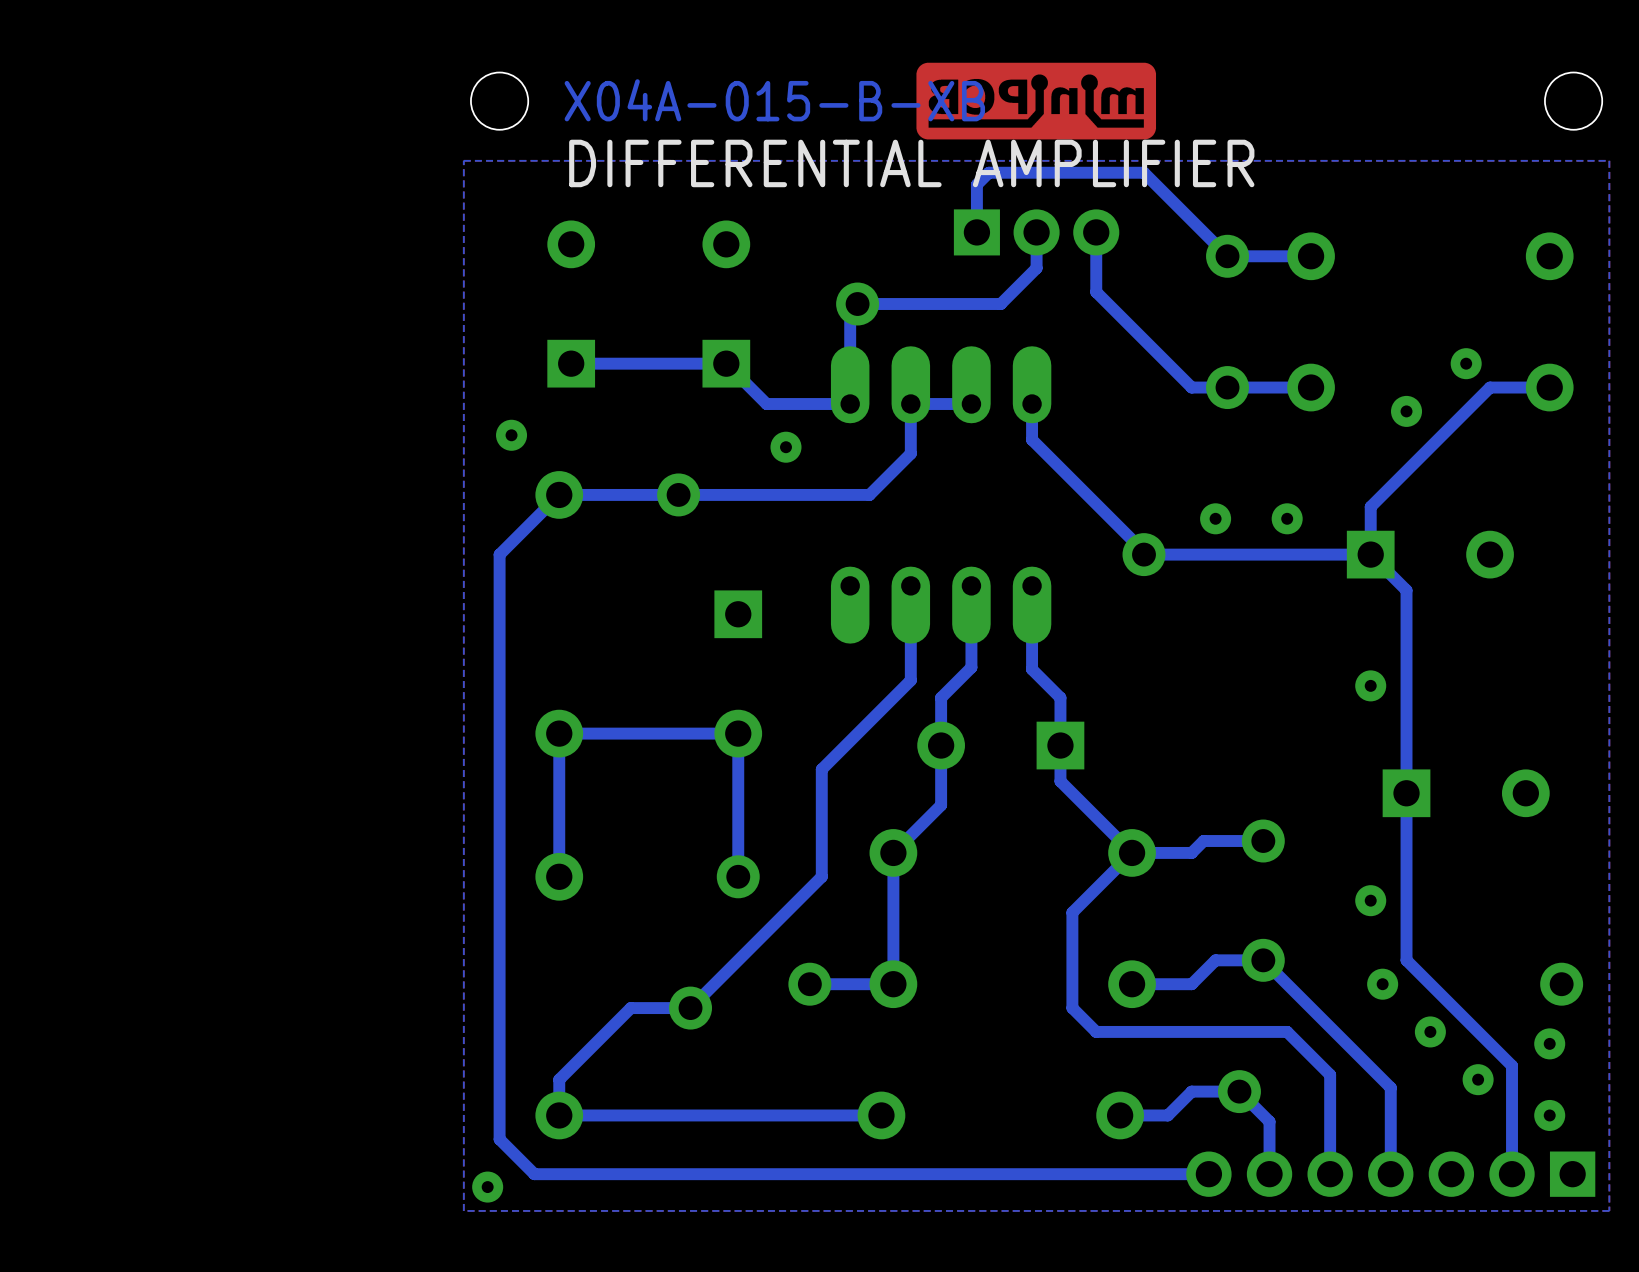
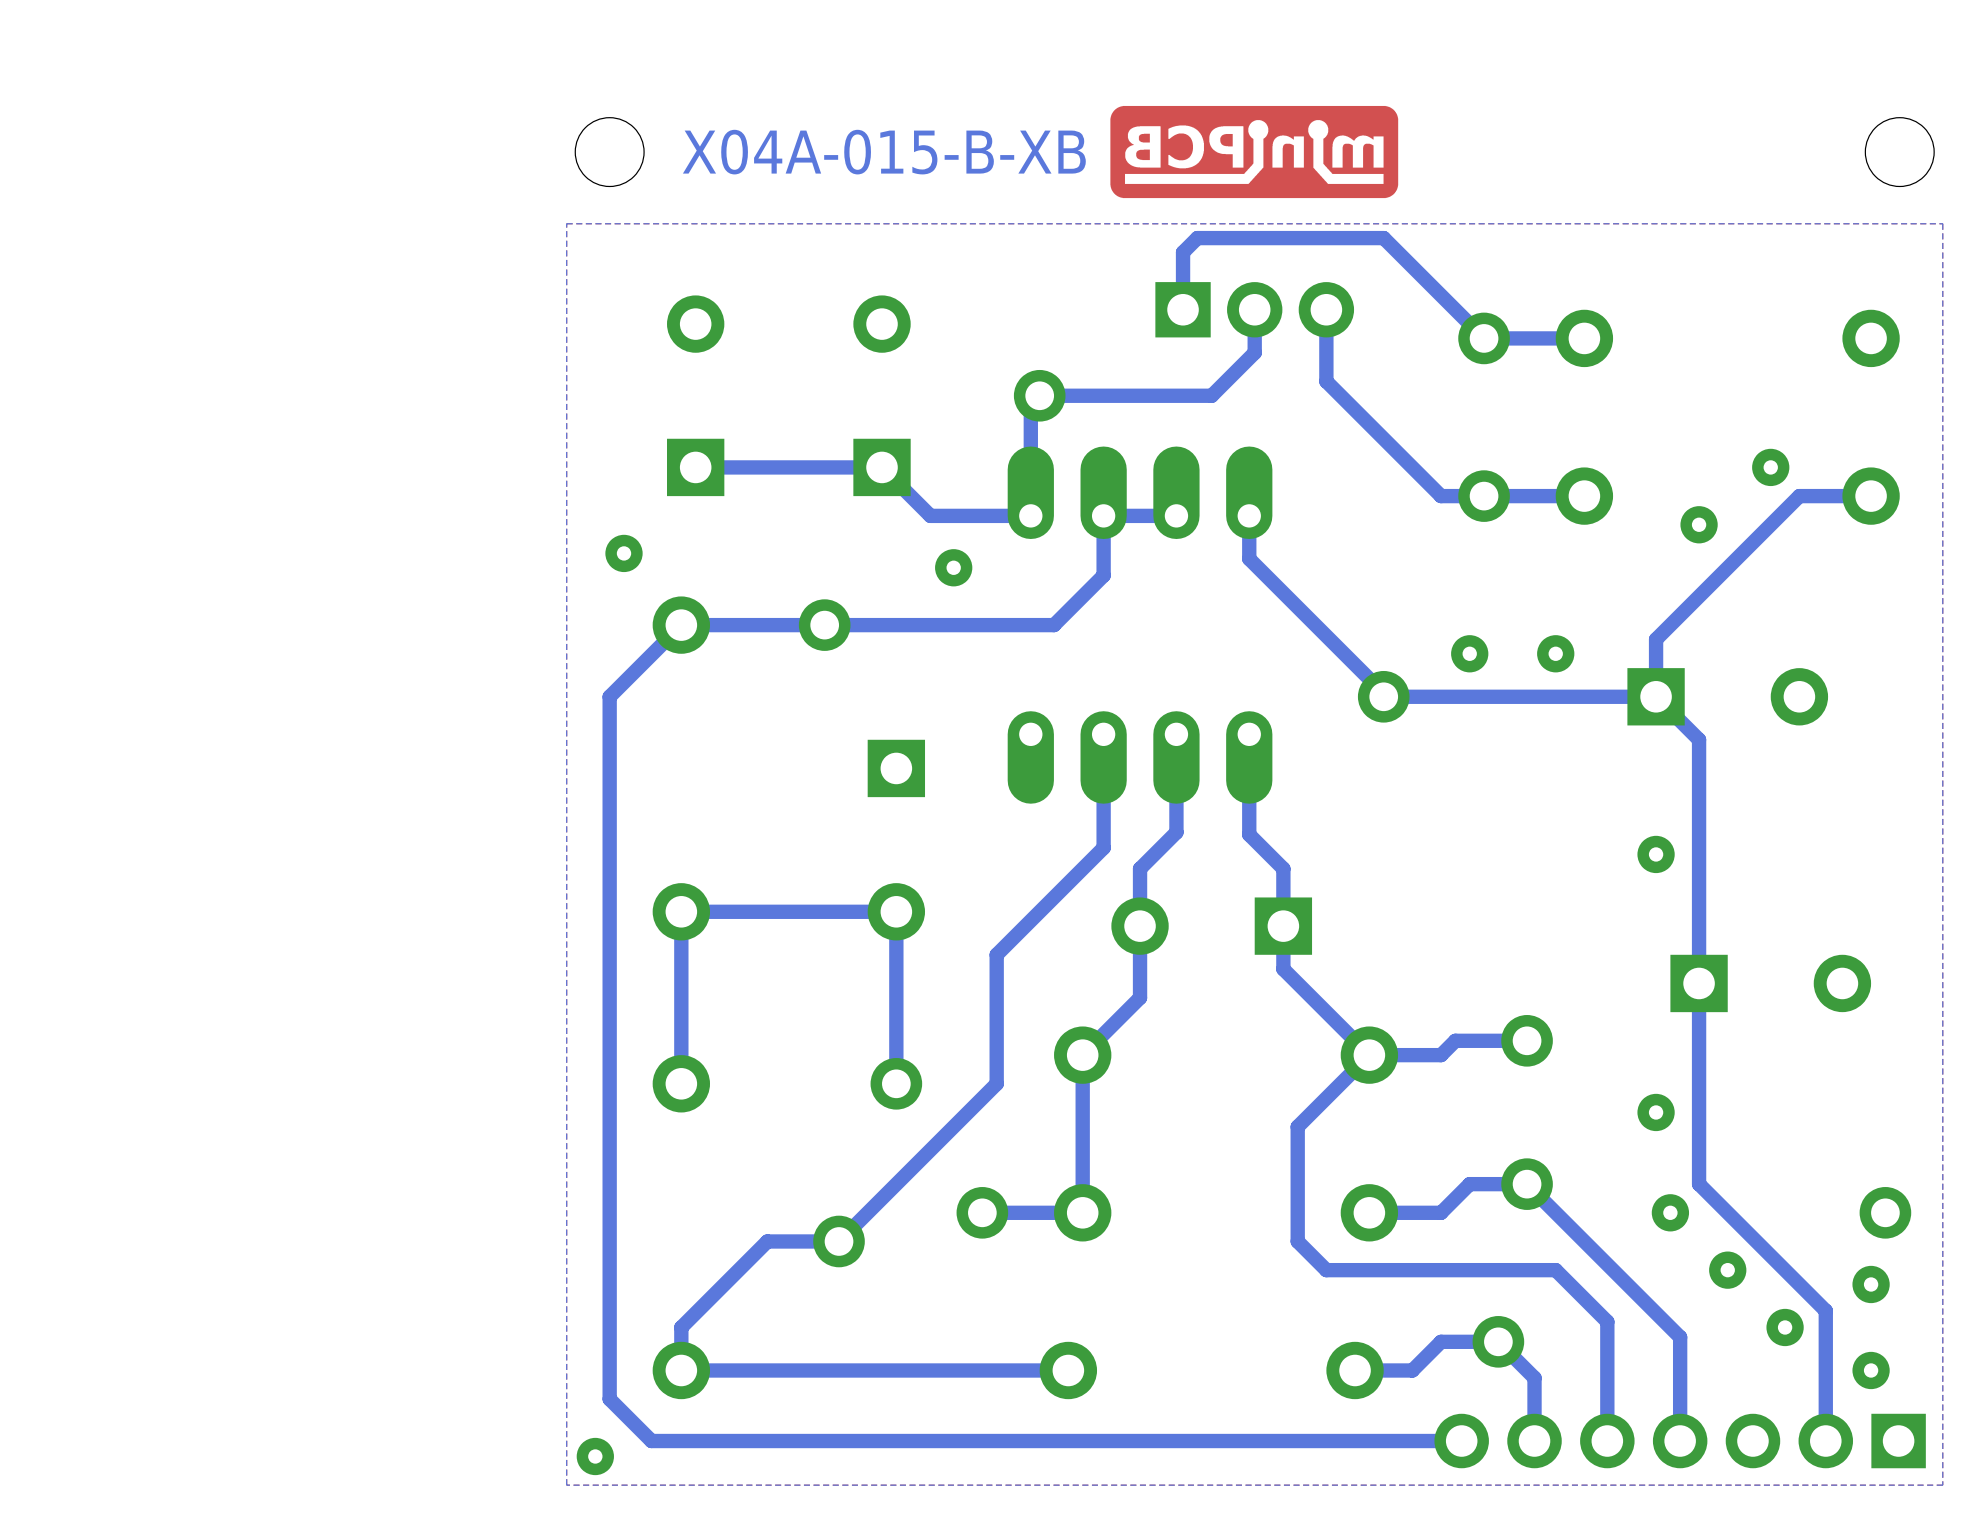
text: DIFFERENTIAL AMPLIFIER (911, 163) -> none

